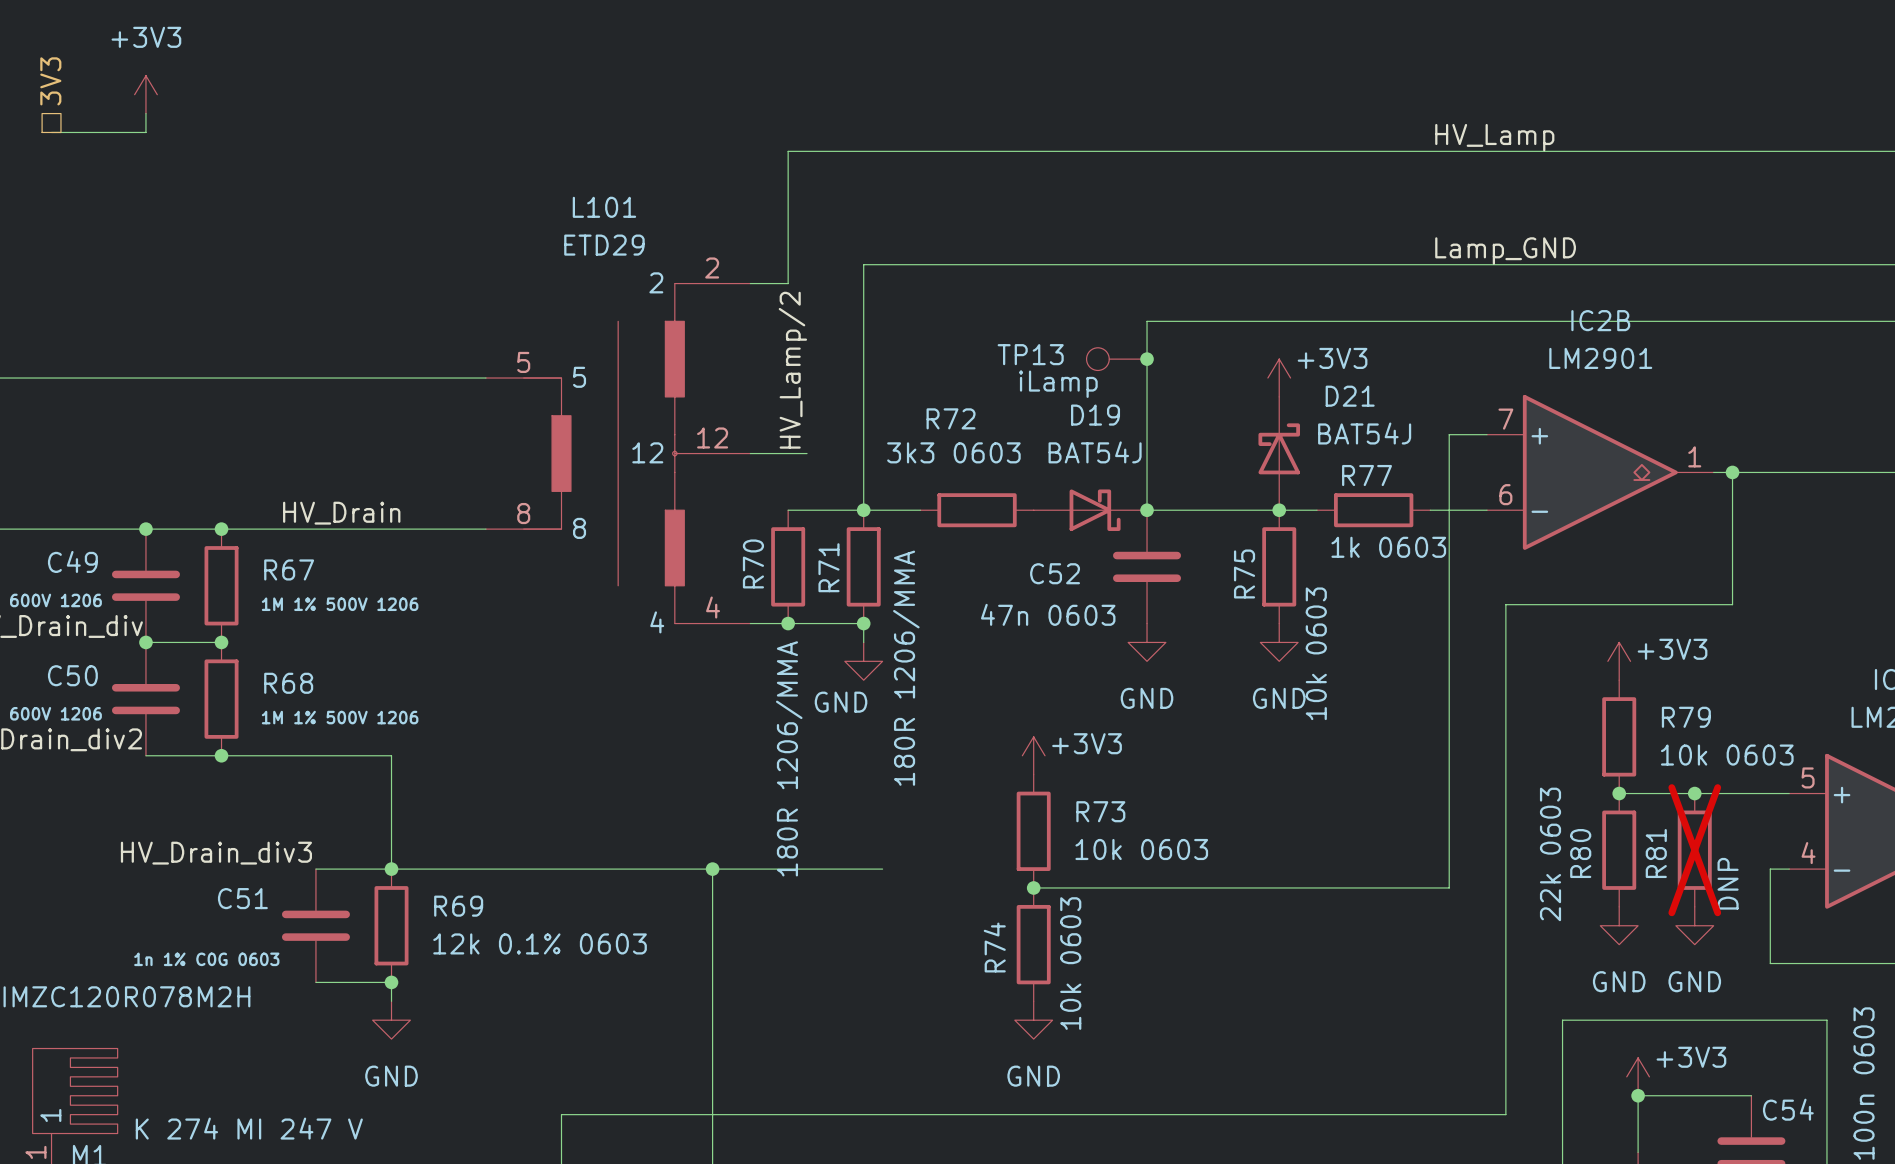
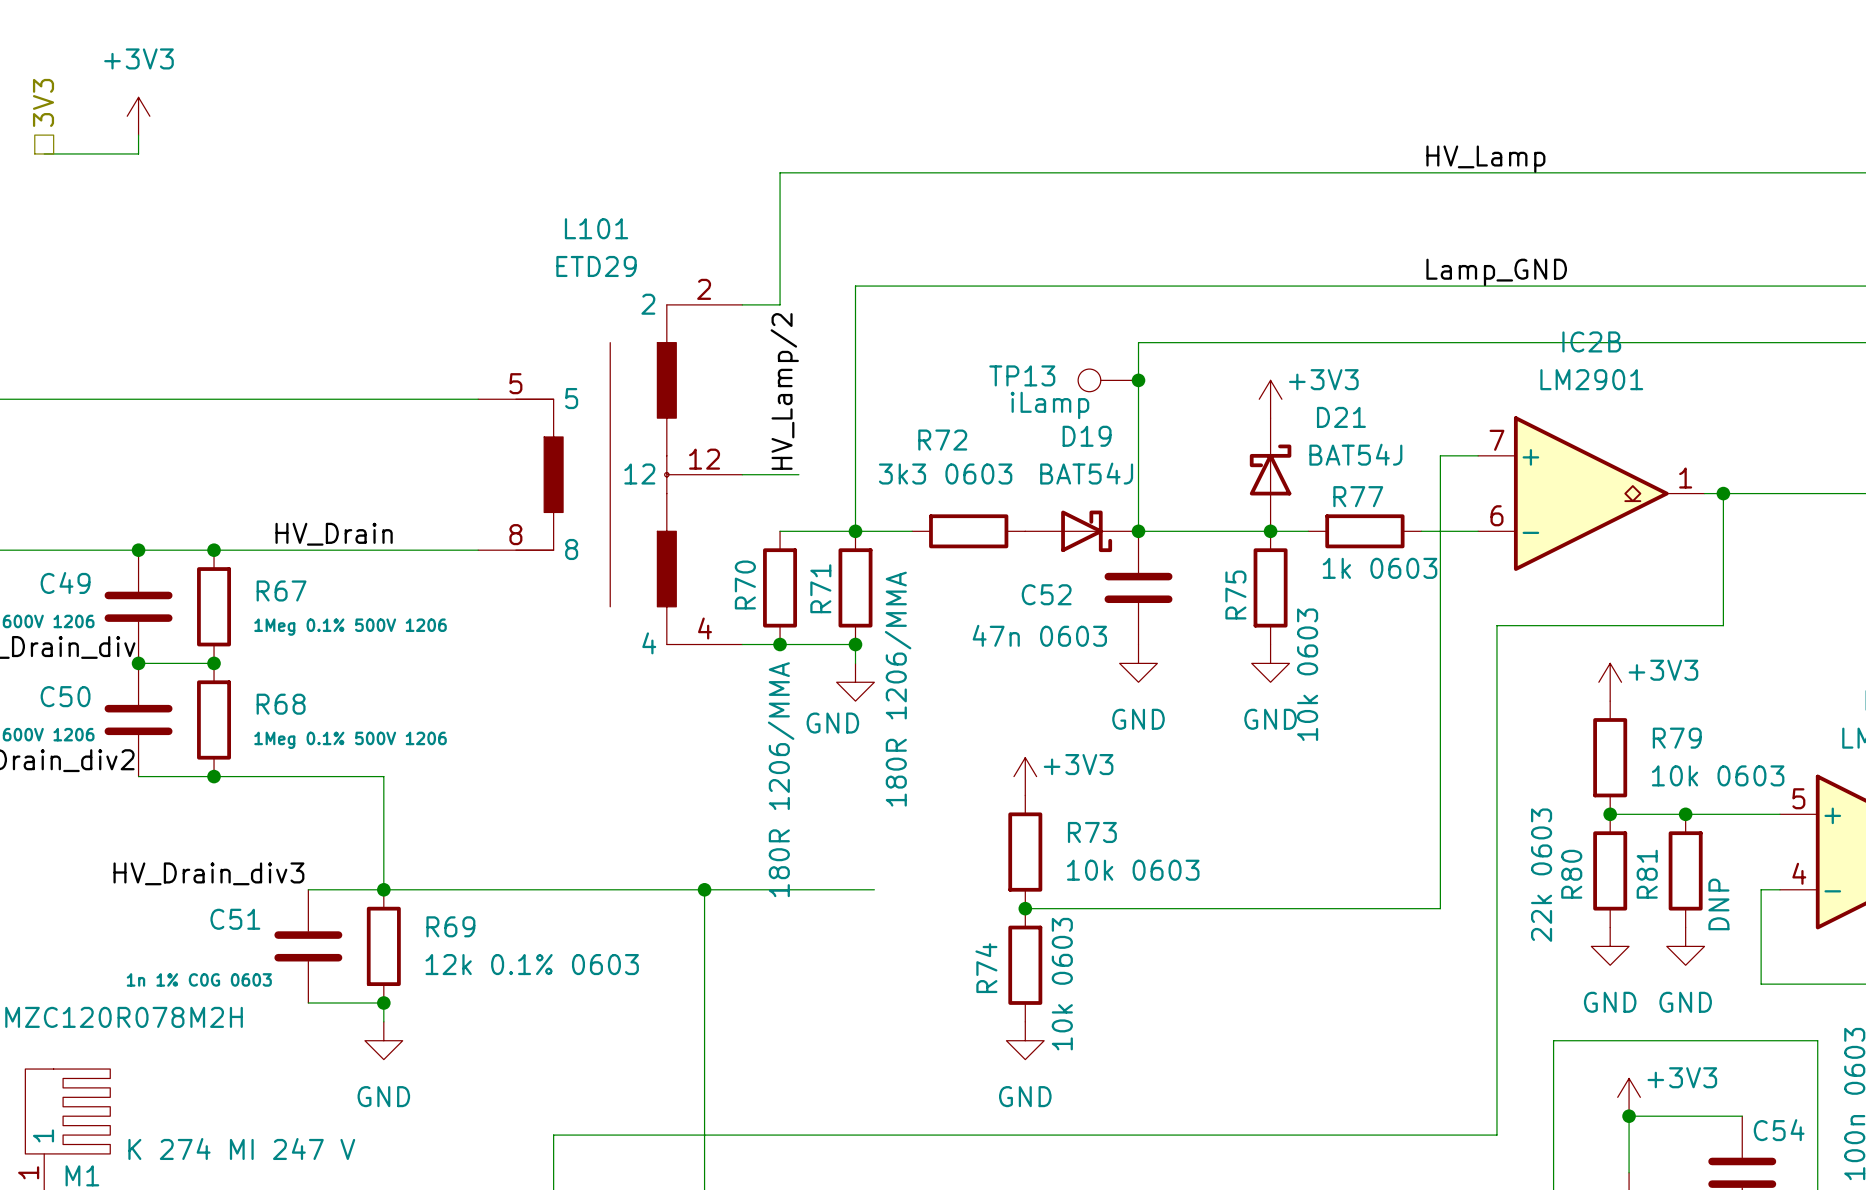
R67 value: 1M 1% 500V 1206 (340, 604) -> 1Meg 0.1% 500V 1206 (350, 627)
R68 value: 1M 1% 500V 1206 (340, 717) -> 1Meg 0.1% 500V 1206 (350, 740)
R81 do-not-place cross: (1694, 850) -> none

